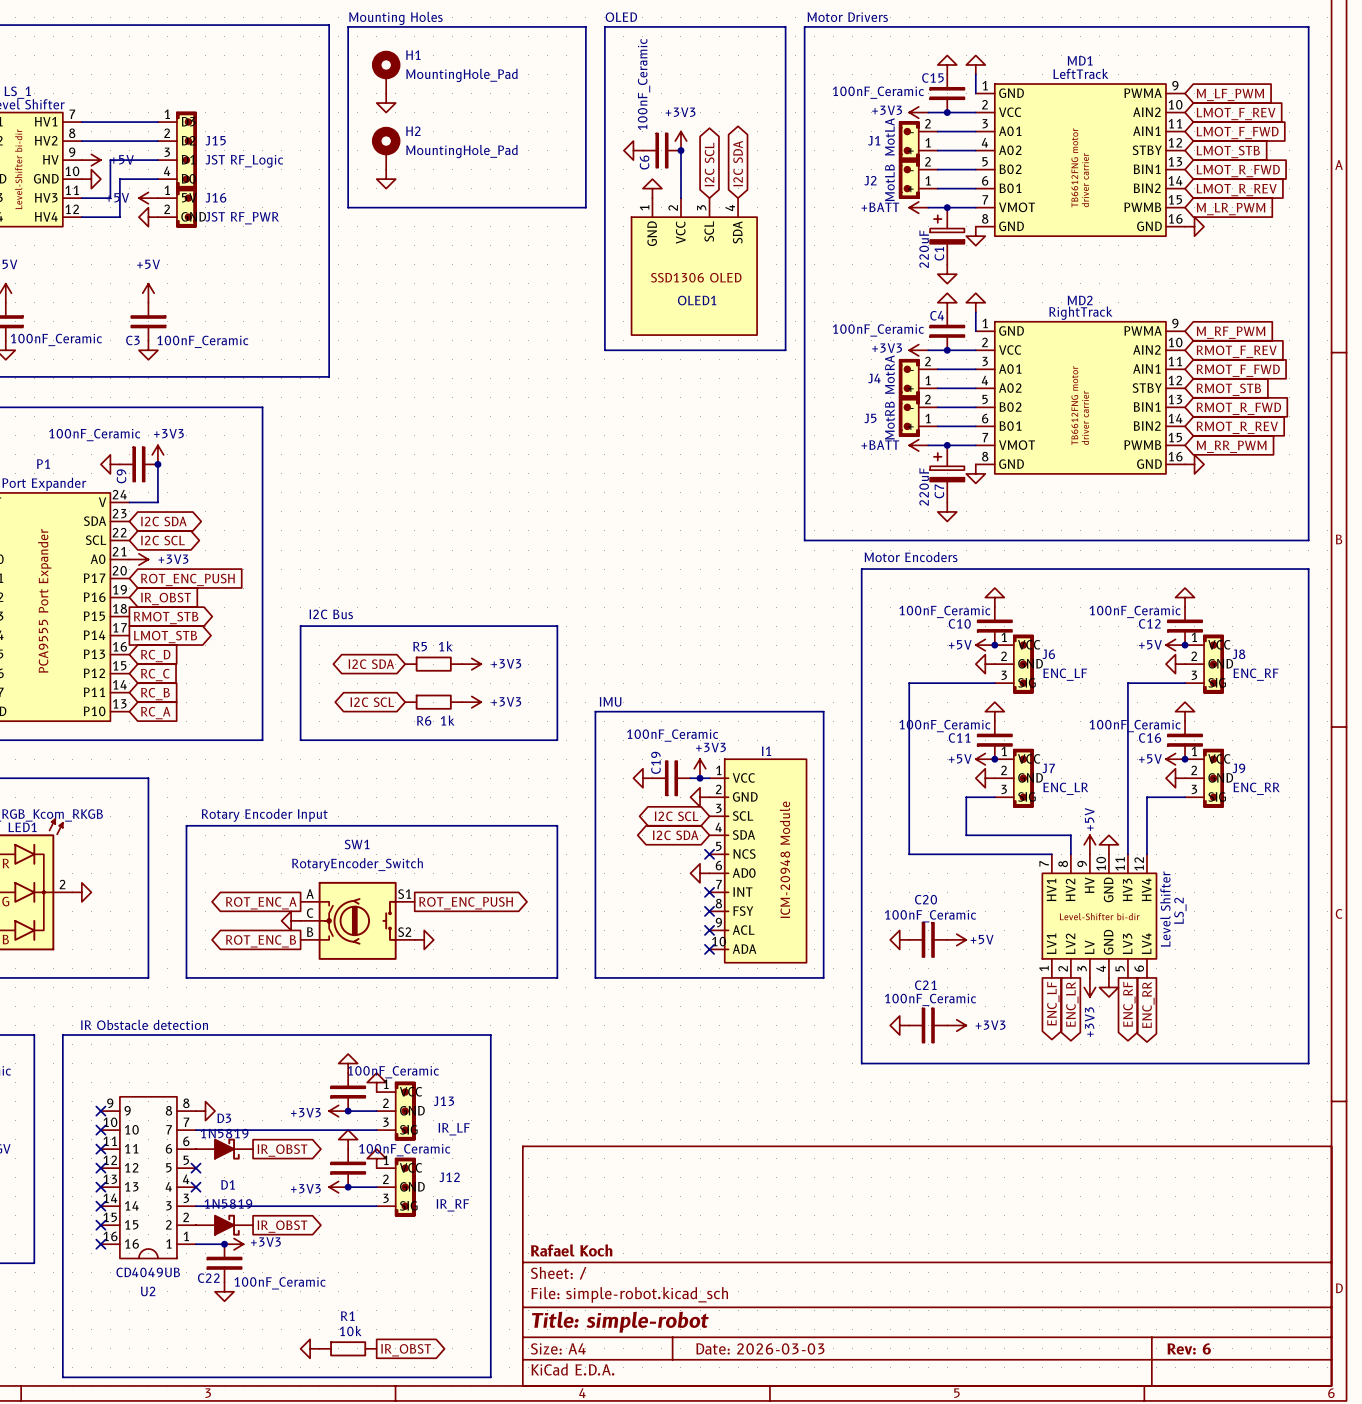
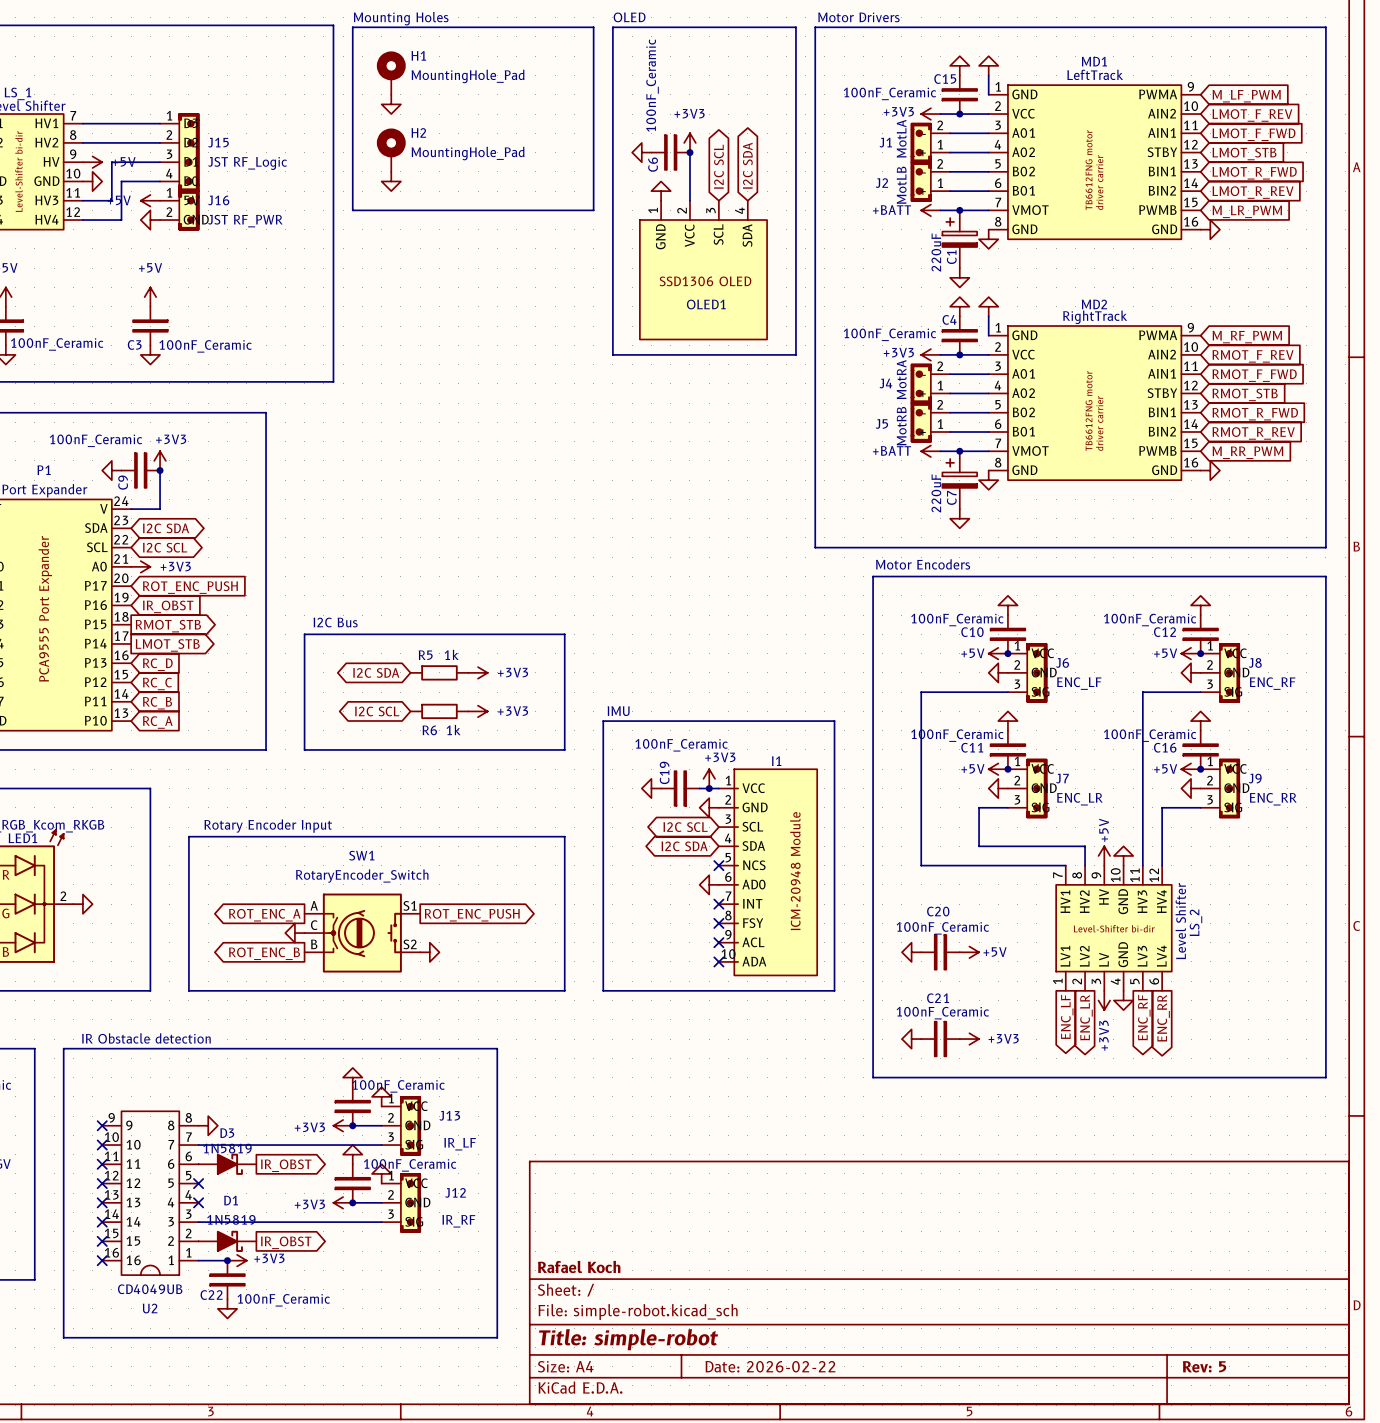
line: (62, 1320) (62, 1377) (490, 1377) (490, 1320) -> (63, 1337) (497, 1337)
power symbol: (310, 1348) -> none
R1: 10k (348, 1348) -> none
title block: Date: 2026-03-03 (760, 1348) -> Date: 2026-02-22 (770, 1366)
title block: Rev: 6 (1189, 1348) -> Rev: 5 (1204, 1366)
global label: IR_OBST (406, 1350) -> none

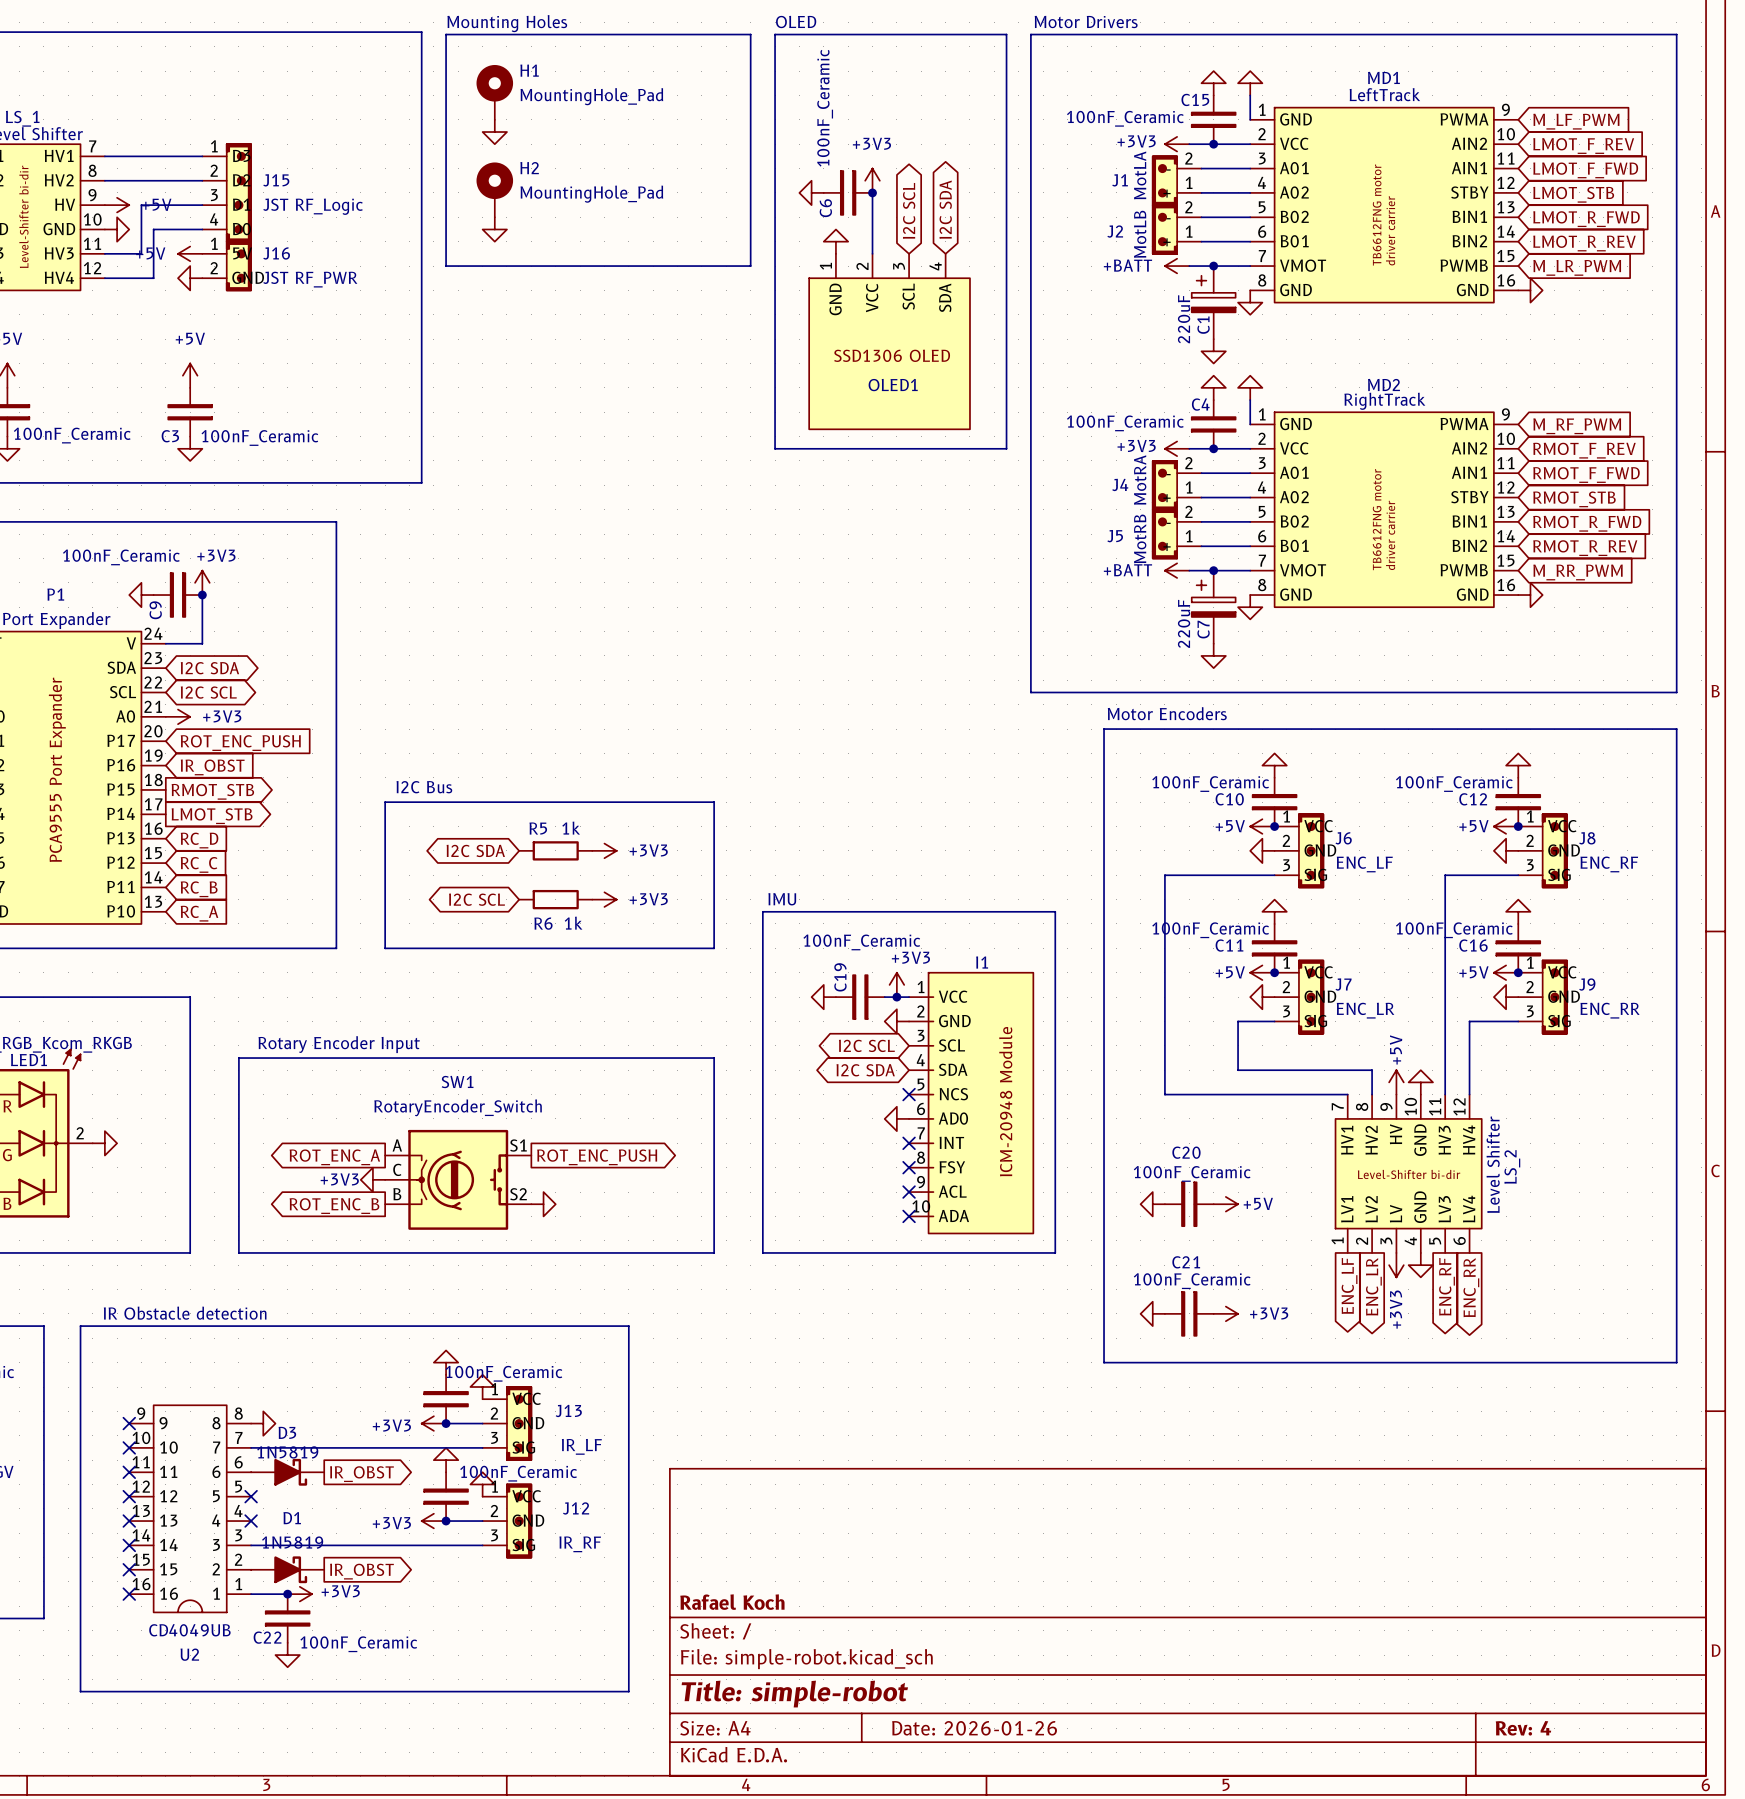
power symbol text: none -> +3V3 (339, 1179)
title block: Date: 2026-02-22 (770, 1366) -> Date: 2026-01-26 (974, 1728)
title block: Rev: 5 (1204, 1366) -> Rev: 4 (1523, 1728)

